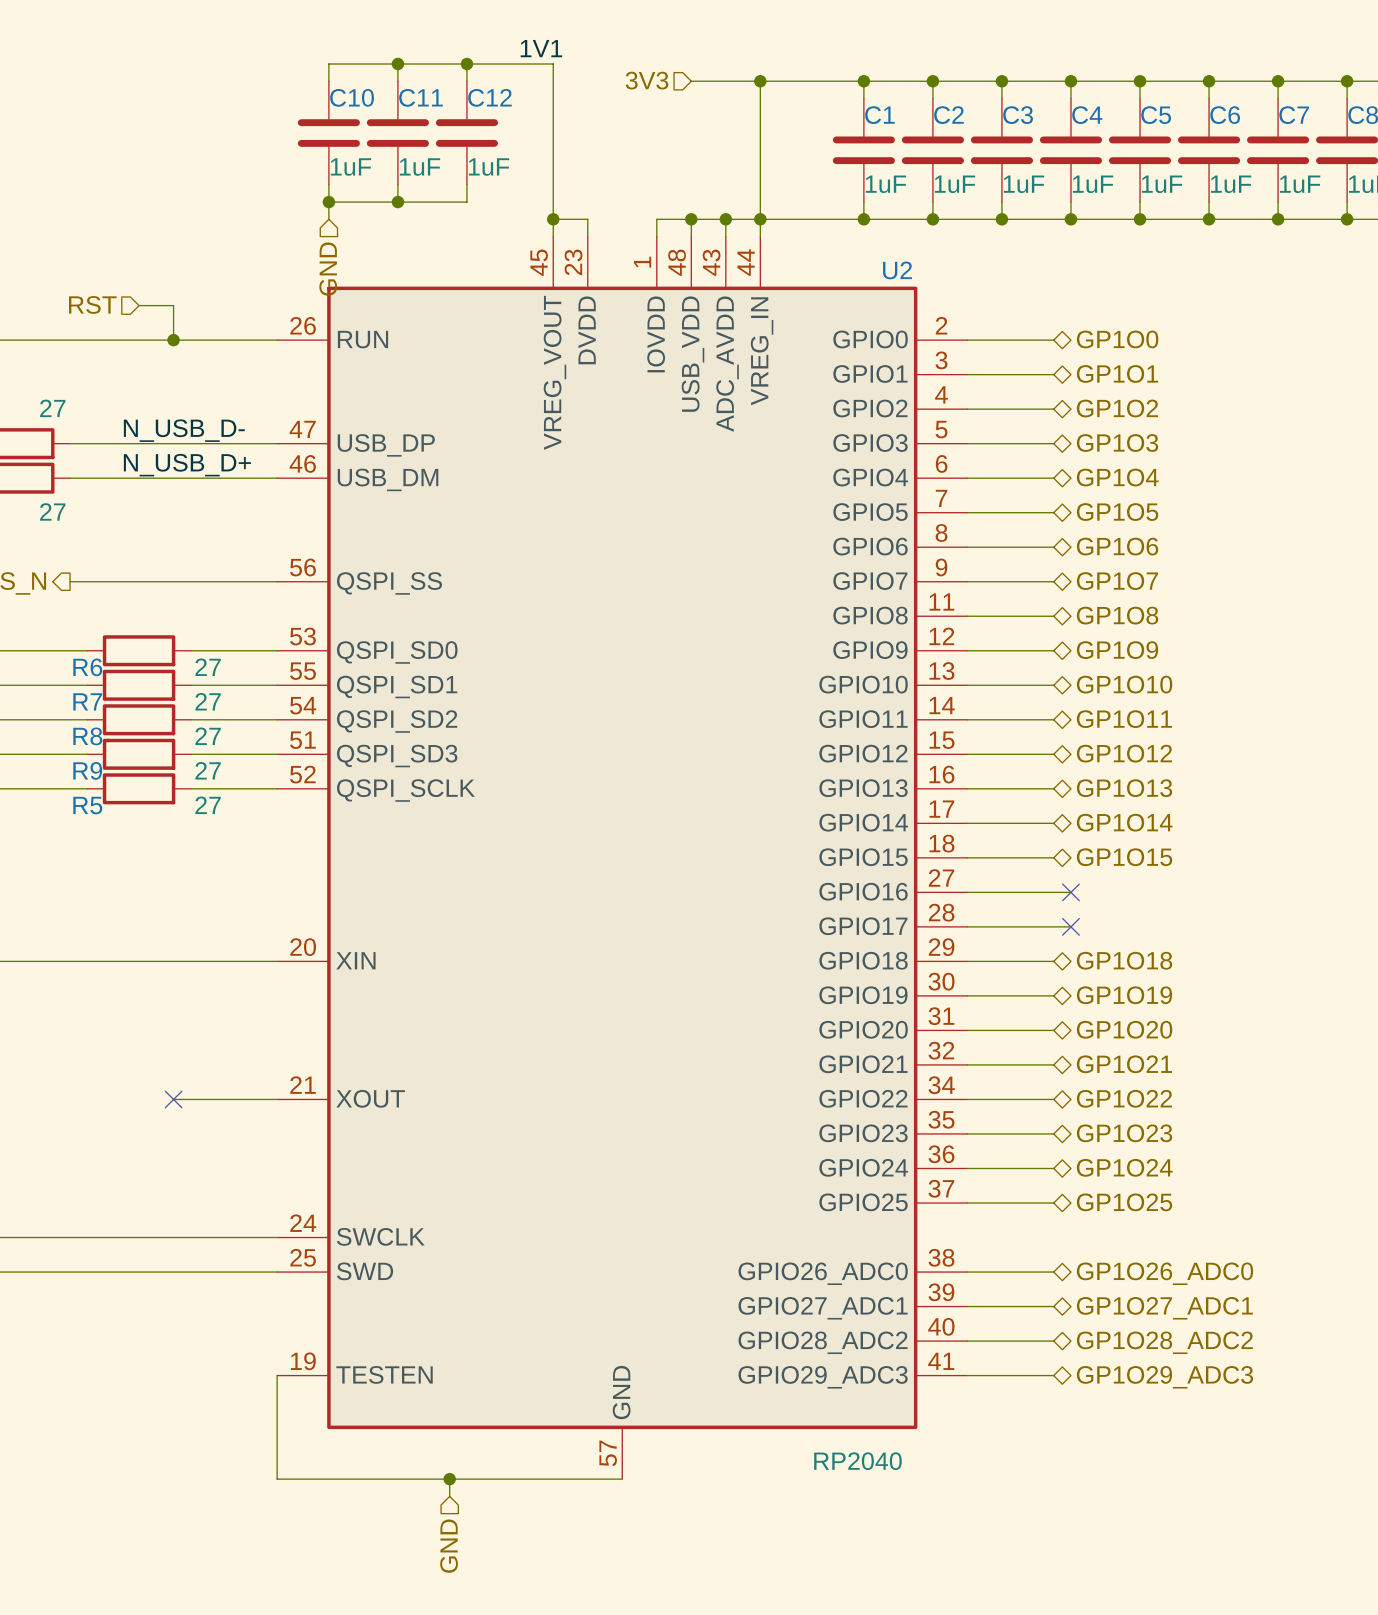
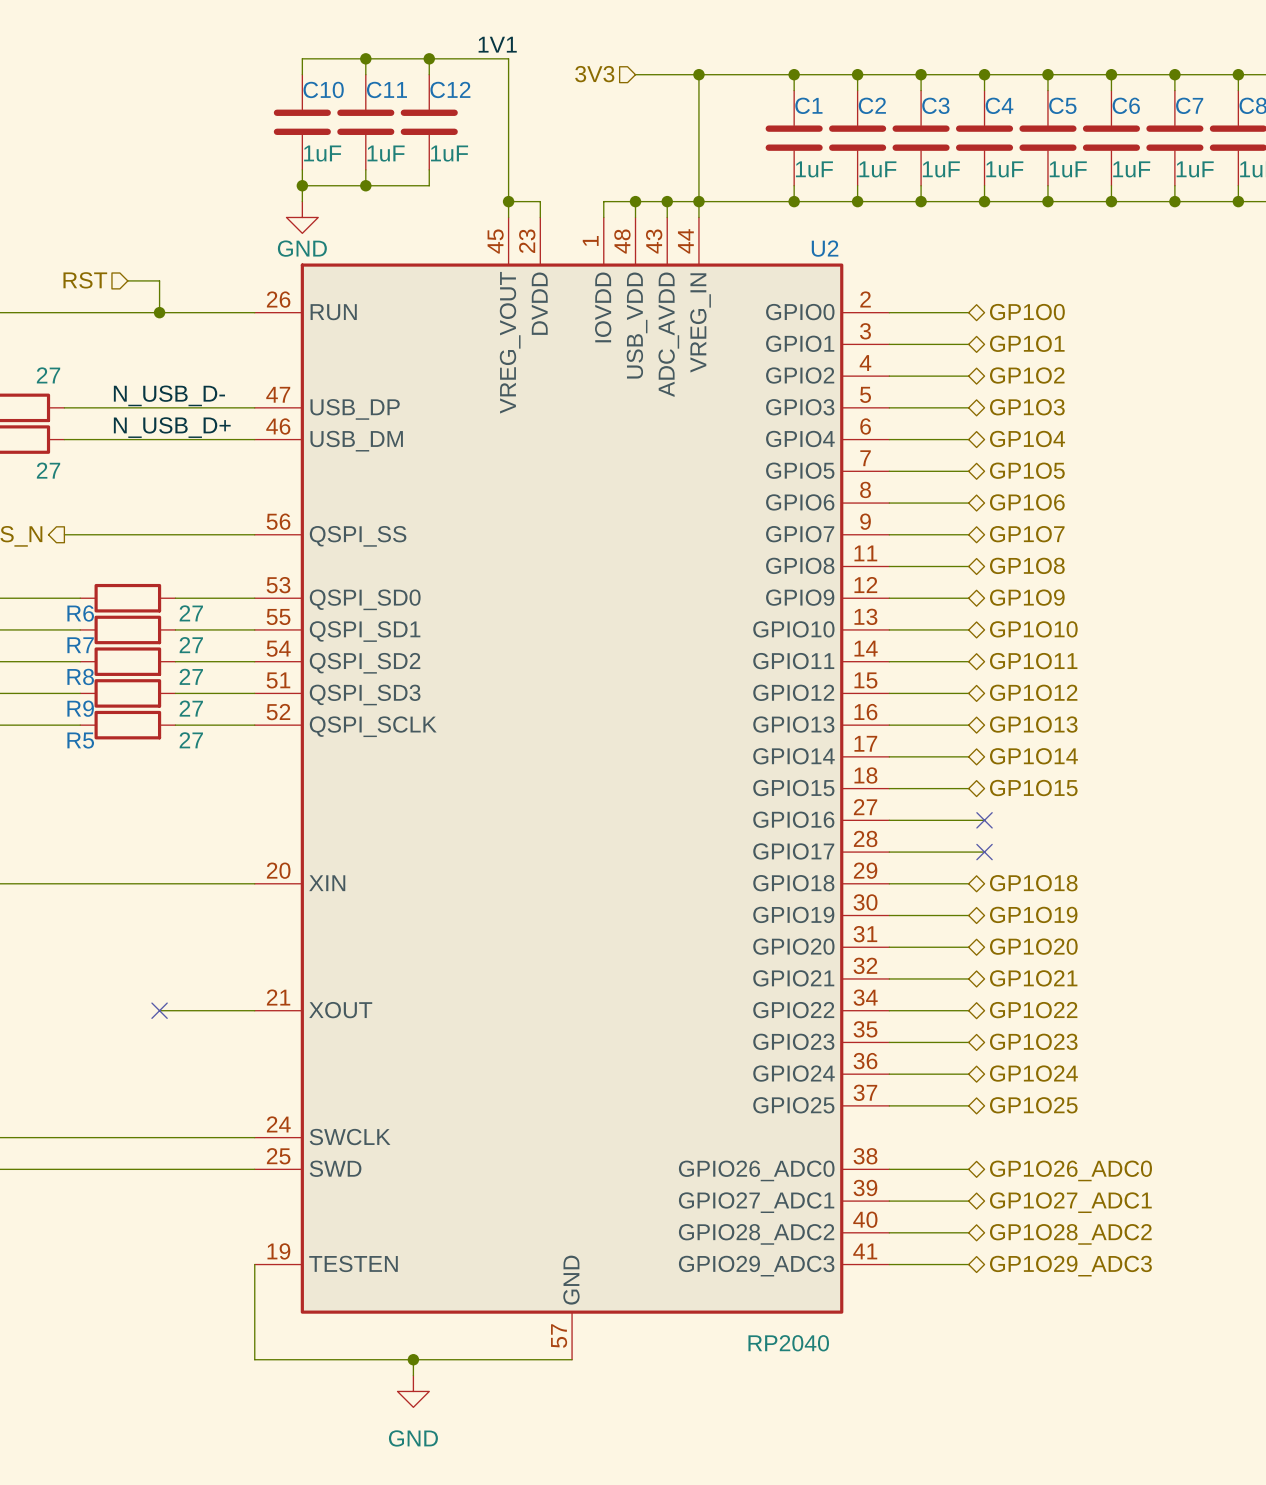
power symbol: none -> GND (302, 217)
hierarchical label: GND (328, 269) -> none
power symbol: none -> GND (413, 1391)
hierarchical label: GND (449, 1546) -> none

